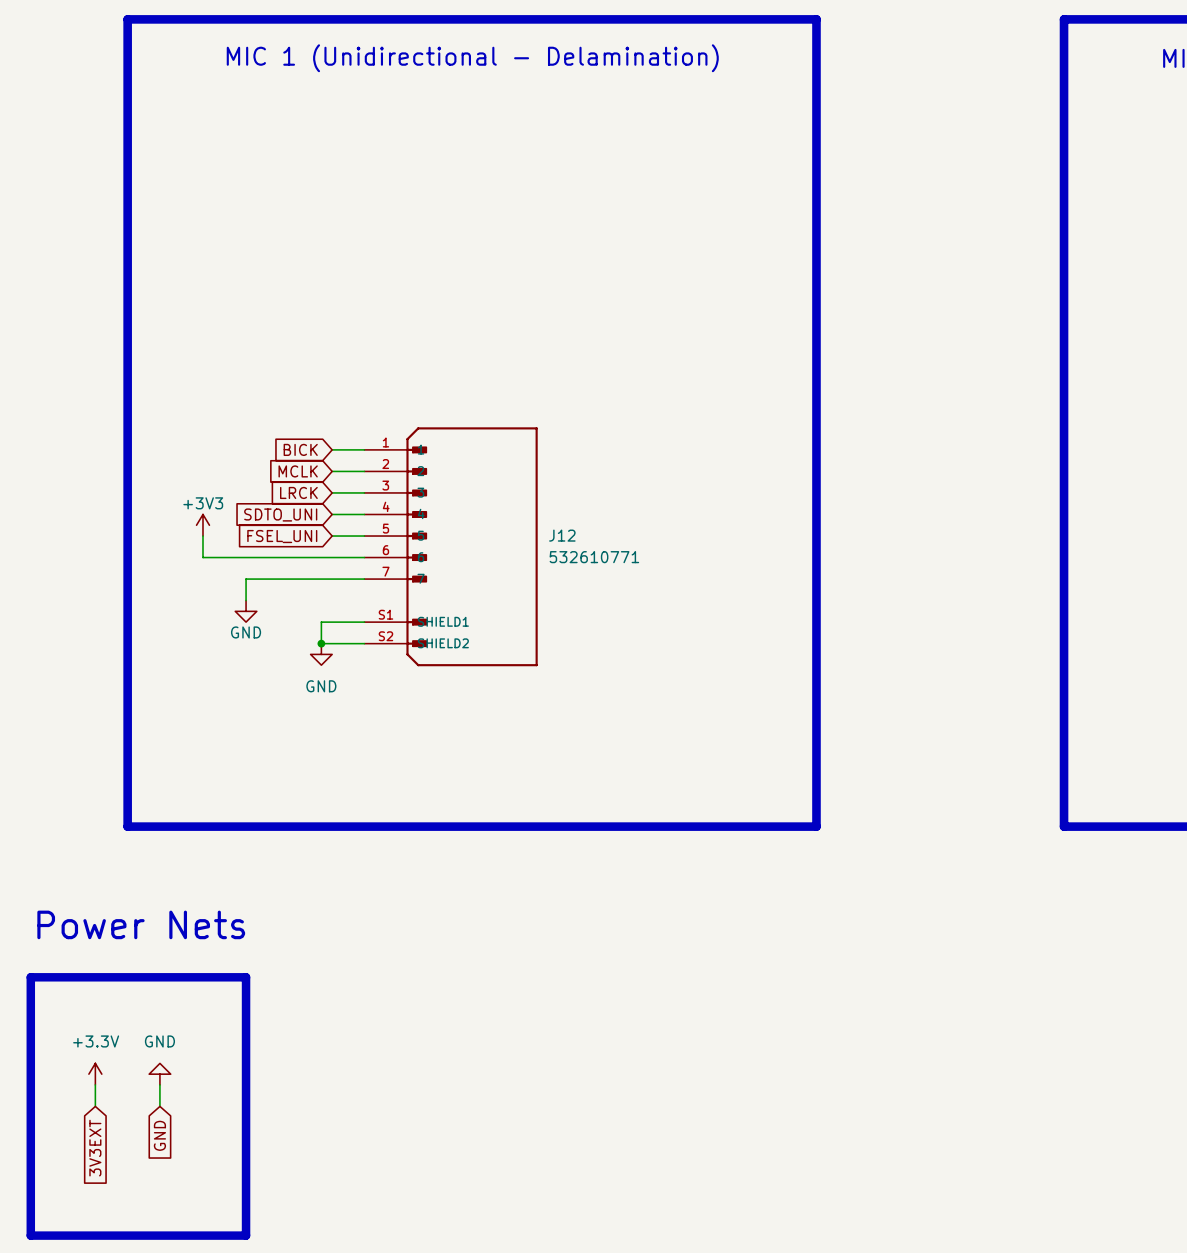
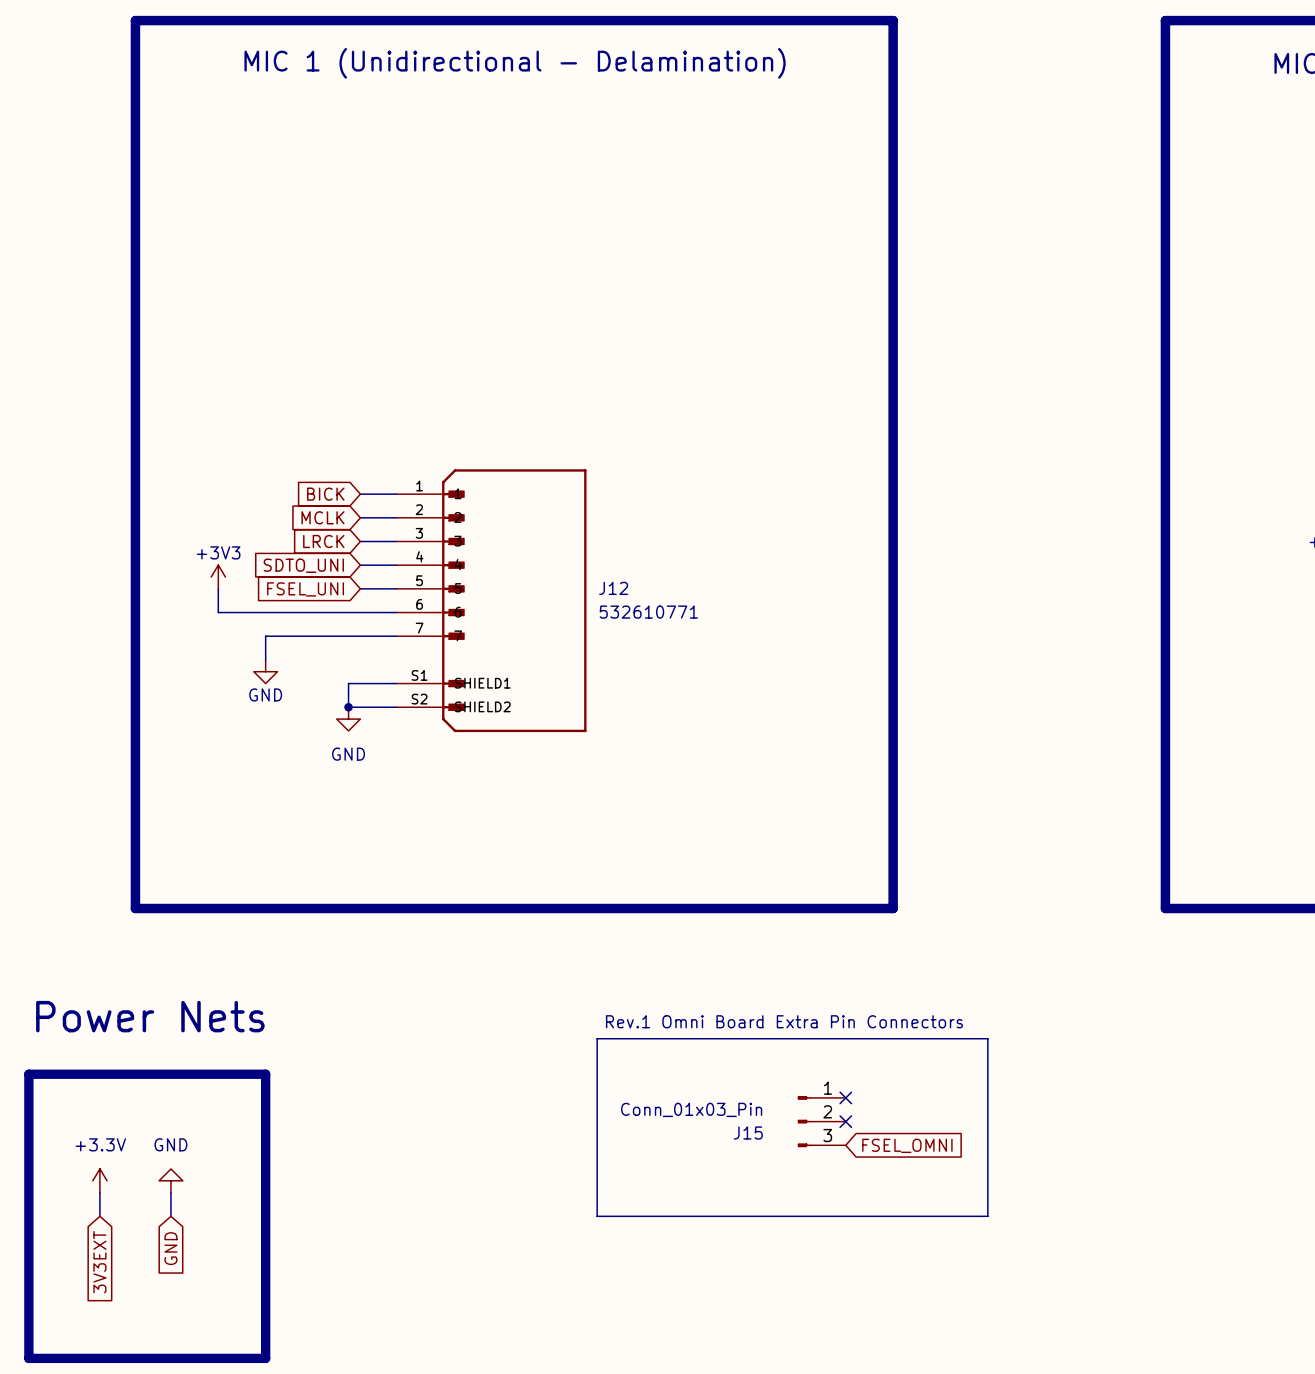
text: none -> Rev.1 Omni Board Extra Pin Connectors (784, 1021)
line: none -> (597, 1038) (987, 1038) (987, 1216) (597, 1216) (597, 1038)
no-connect mark: none -> (845, 1097)
J15: none -> Conn_01x03_Pin (821, 1121)
no-connect mark: none -> (845, 1121)
global label: none -> FSEL_OMNI (907, 1145)

